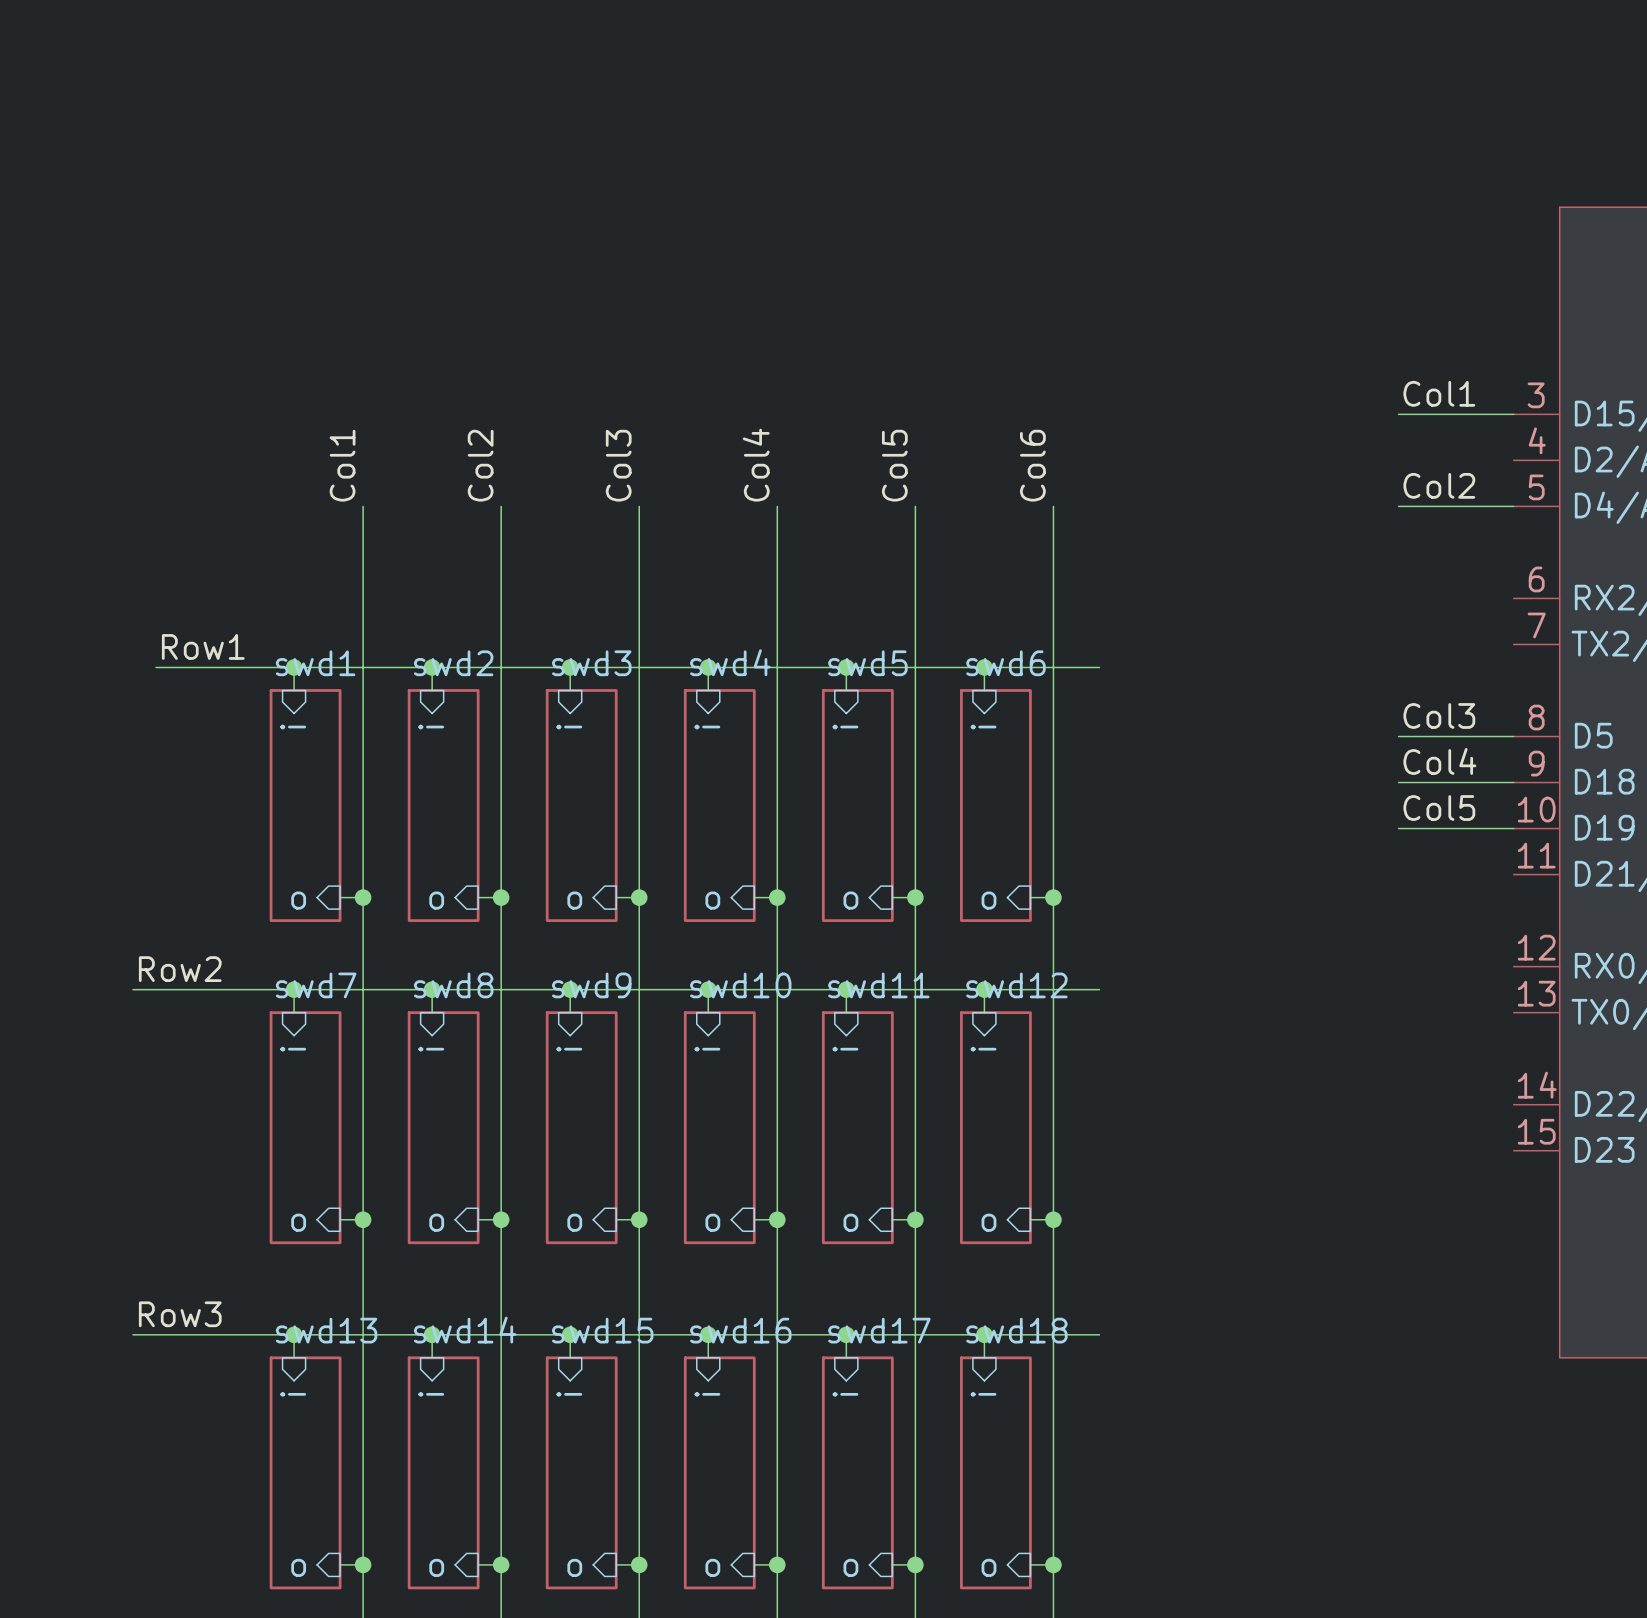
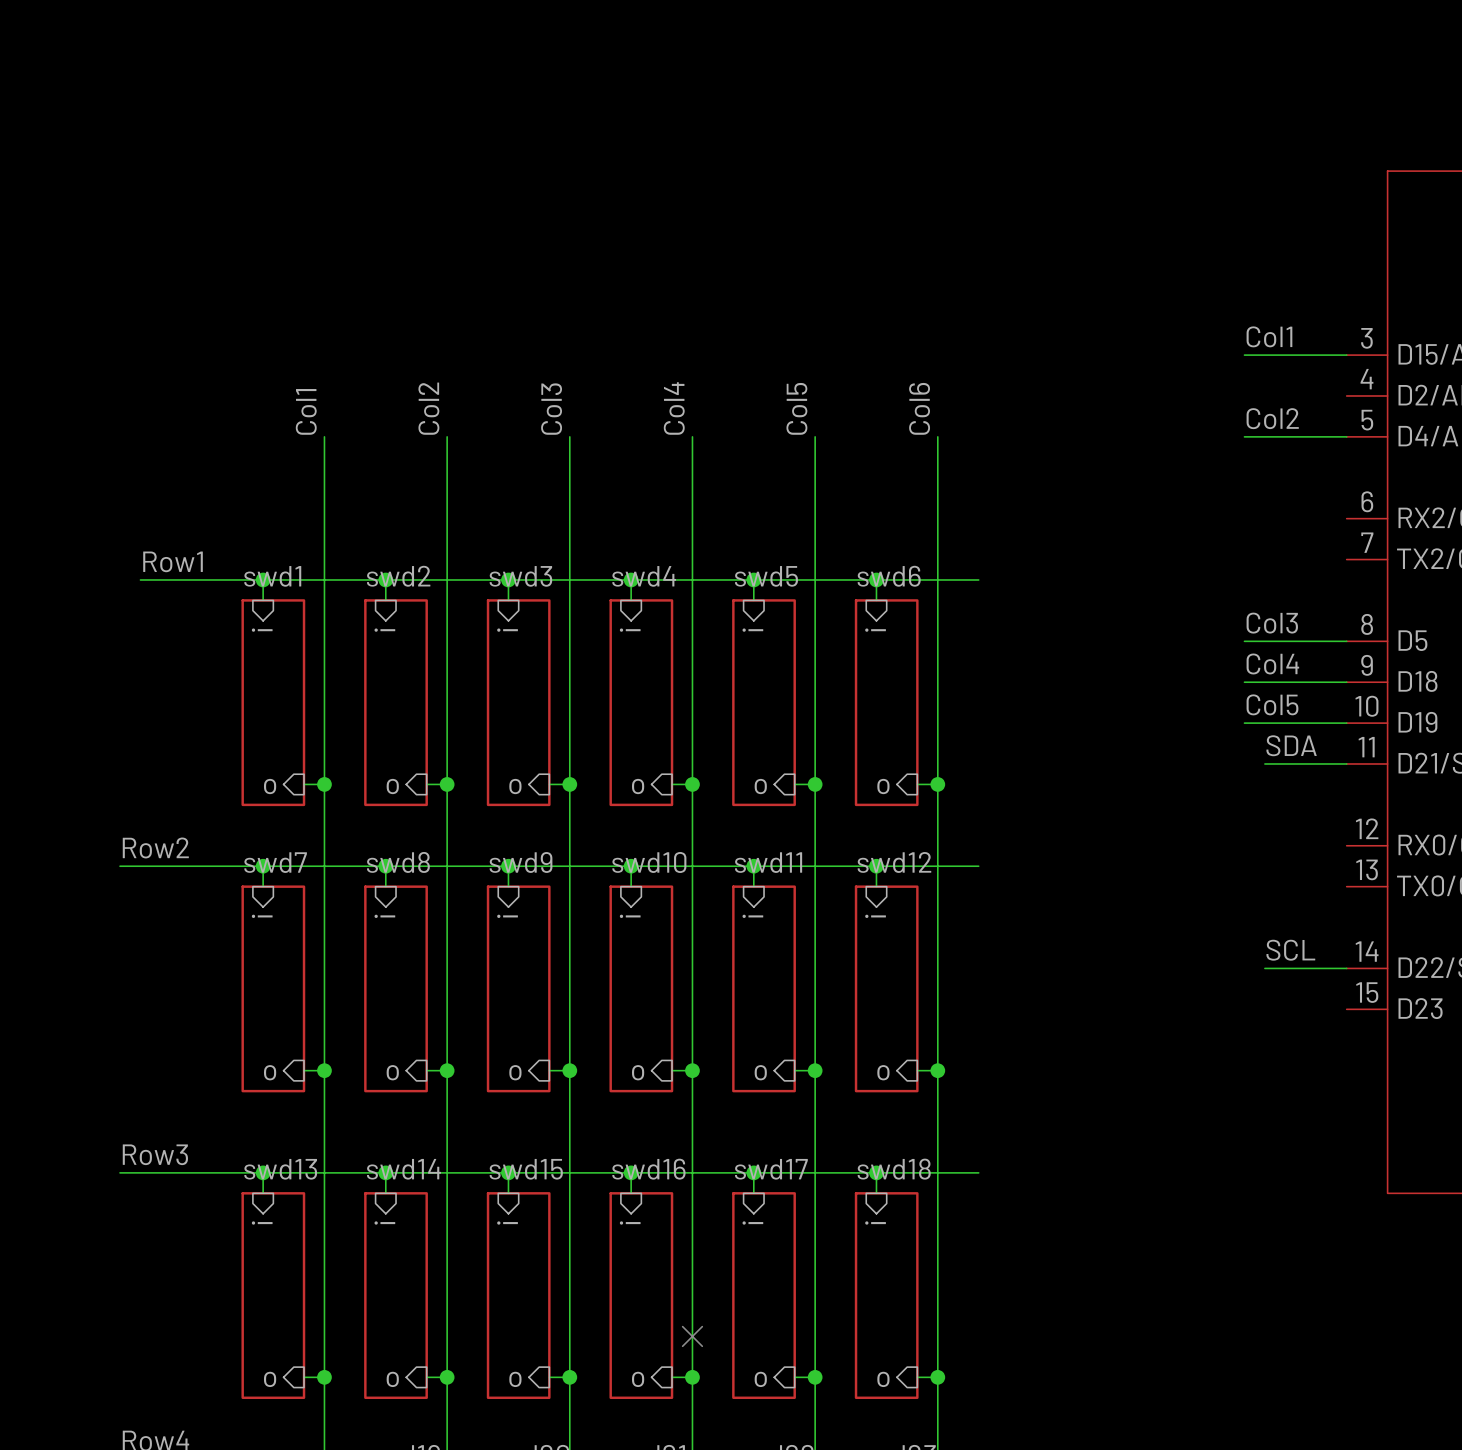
label: none -> SDA (1291, 745)
wire: none -> (1264, 763) (1346, 763)
label: none -> SCL (1290, 950)
wire: none -> (1264, 968) (1346, 968)
no-connect mark: none -> (692, 1336)

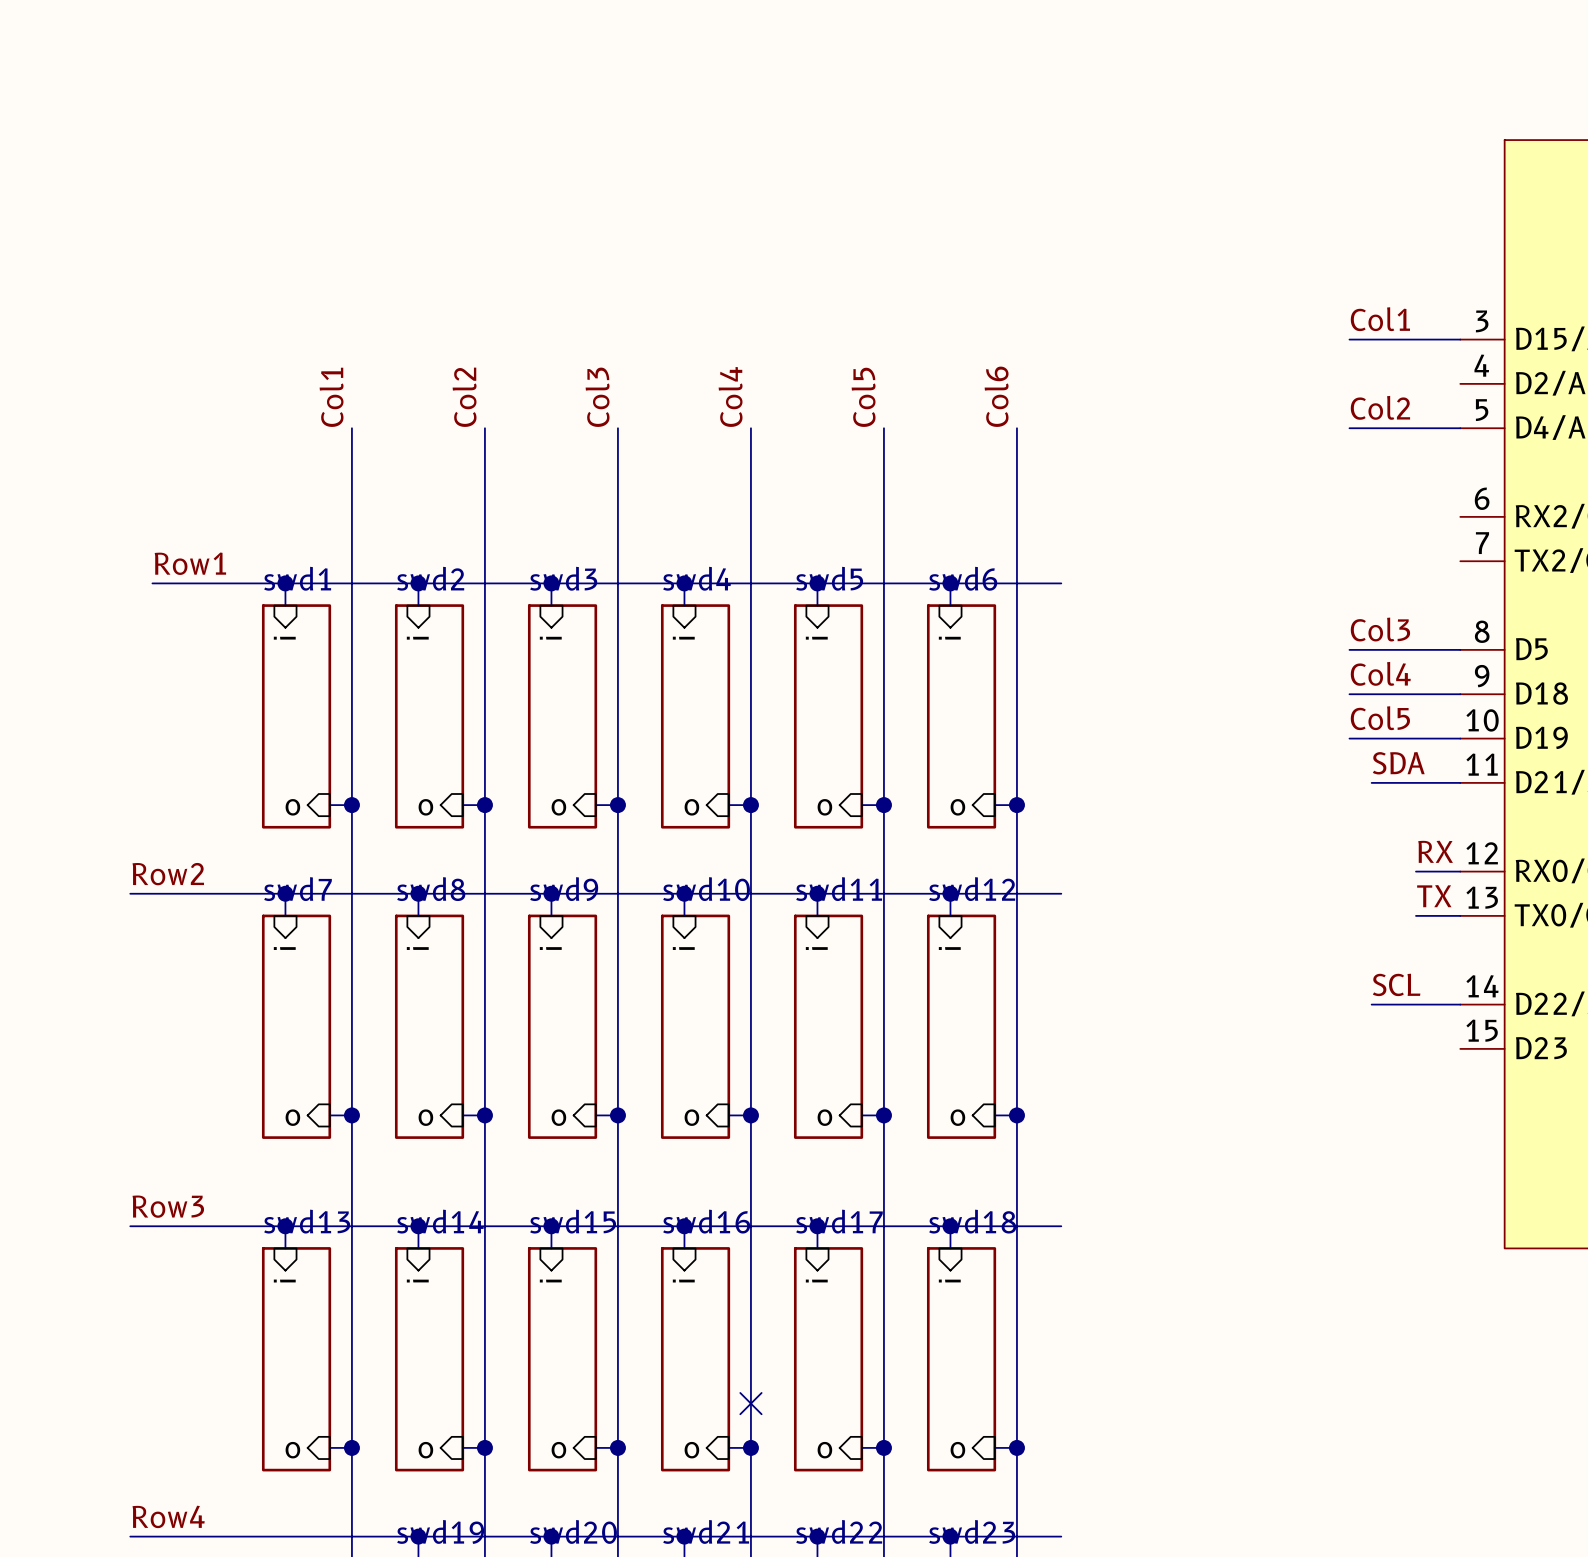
label: none -> RX (1435, 851)
wire: none -> (1415, 871) (1460, 871)
label: none -> TX (1434, 896)
wire: none -> (1415, 915) (1460, 915)

